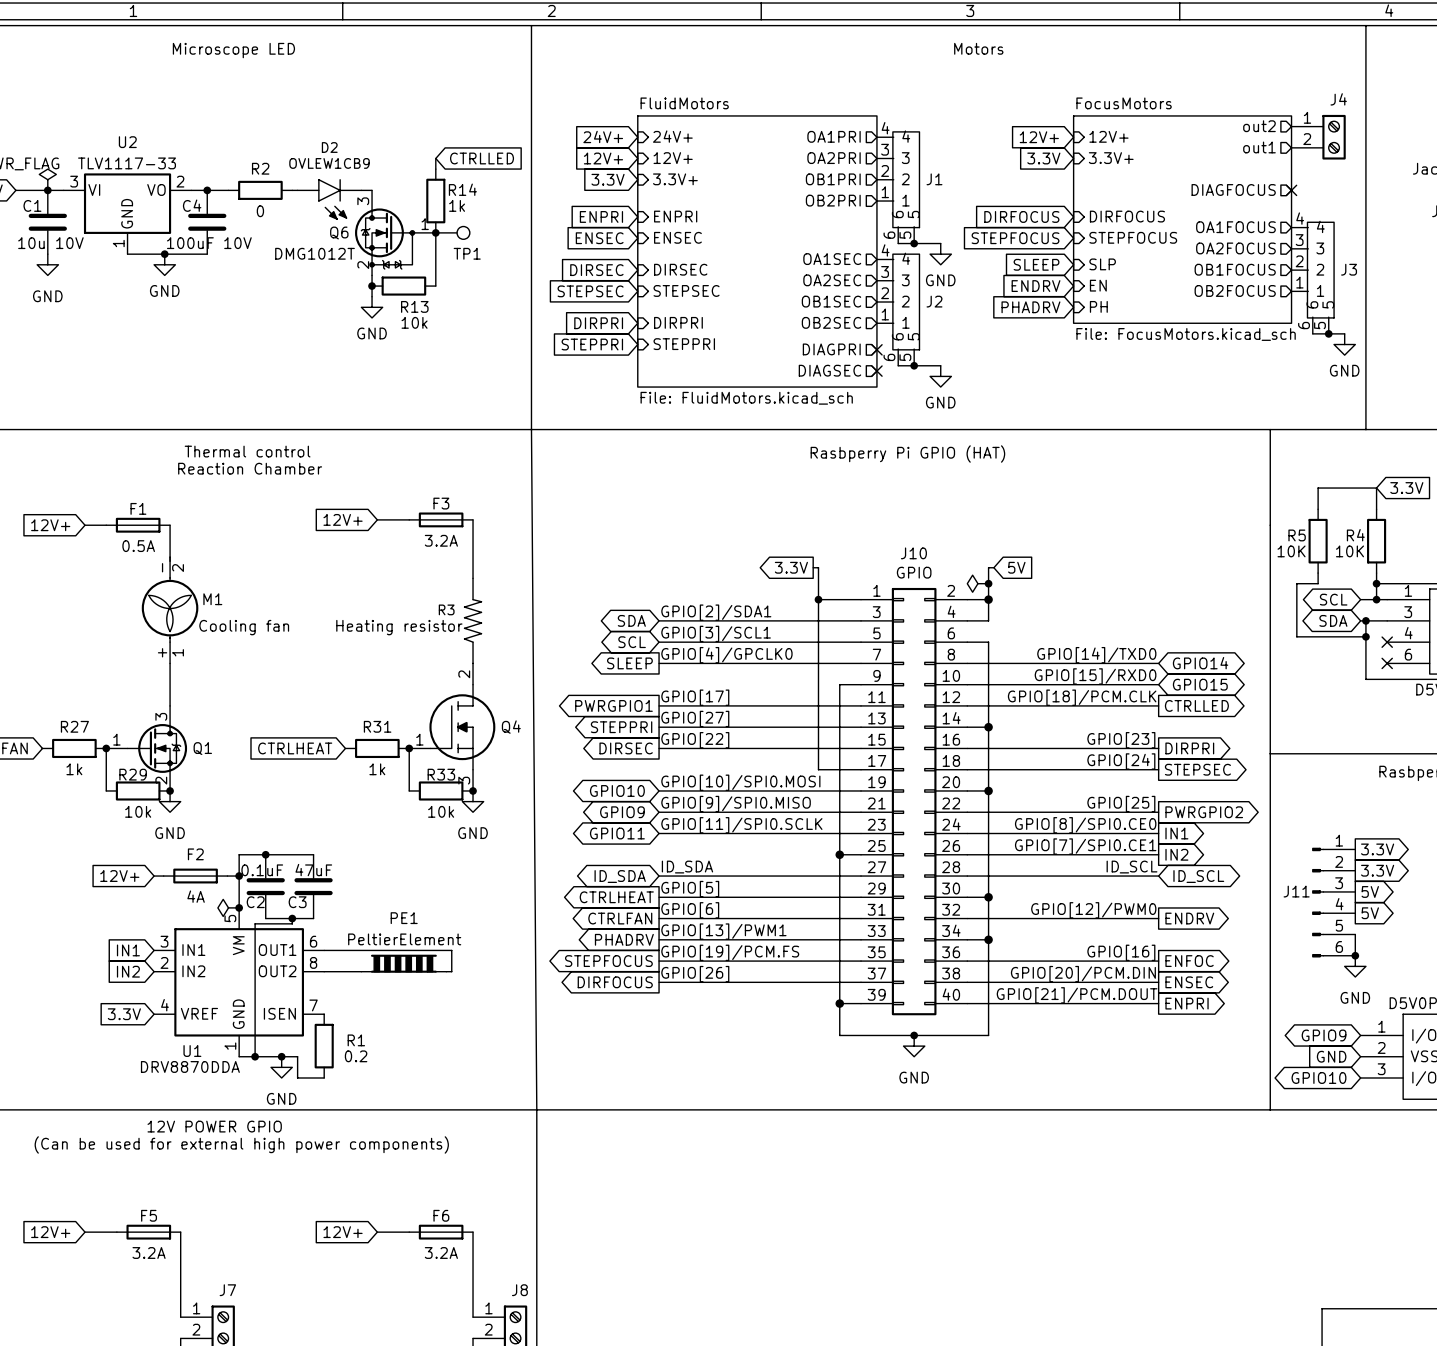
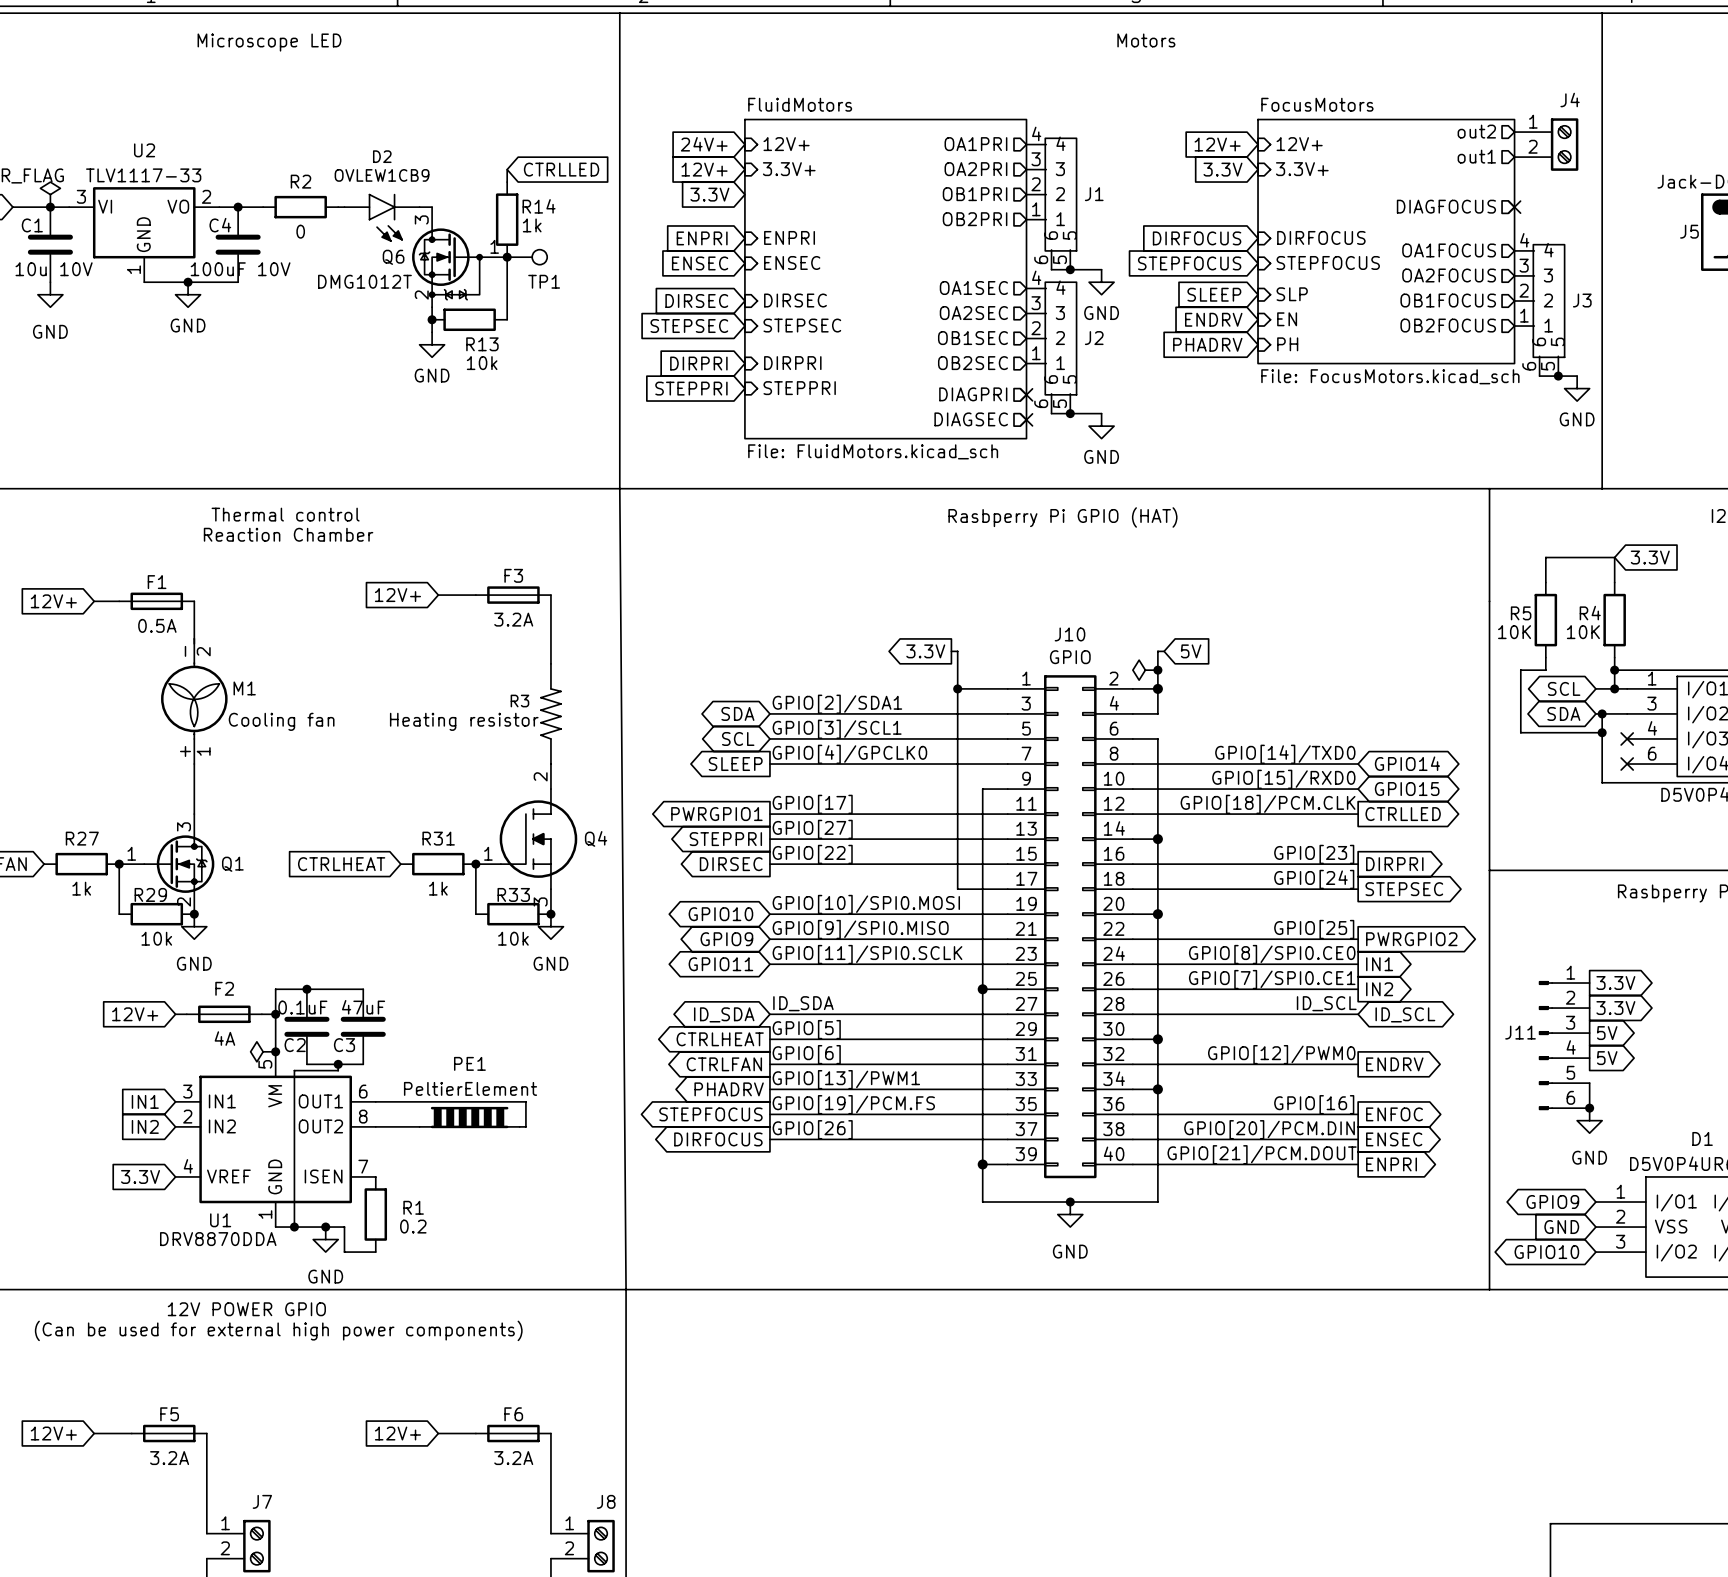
sheet pin: 24V+ (672, 136) -> 12V+ (786, 144)
sheet pin: 12V+ (673, 158) -> 3.3V+ (789, 169)
sheet pin: 3.3V+ (675, 179) -> none

